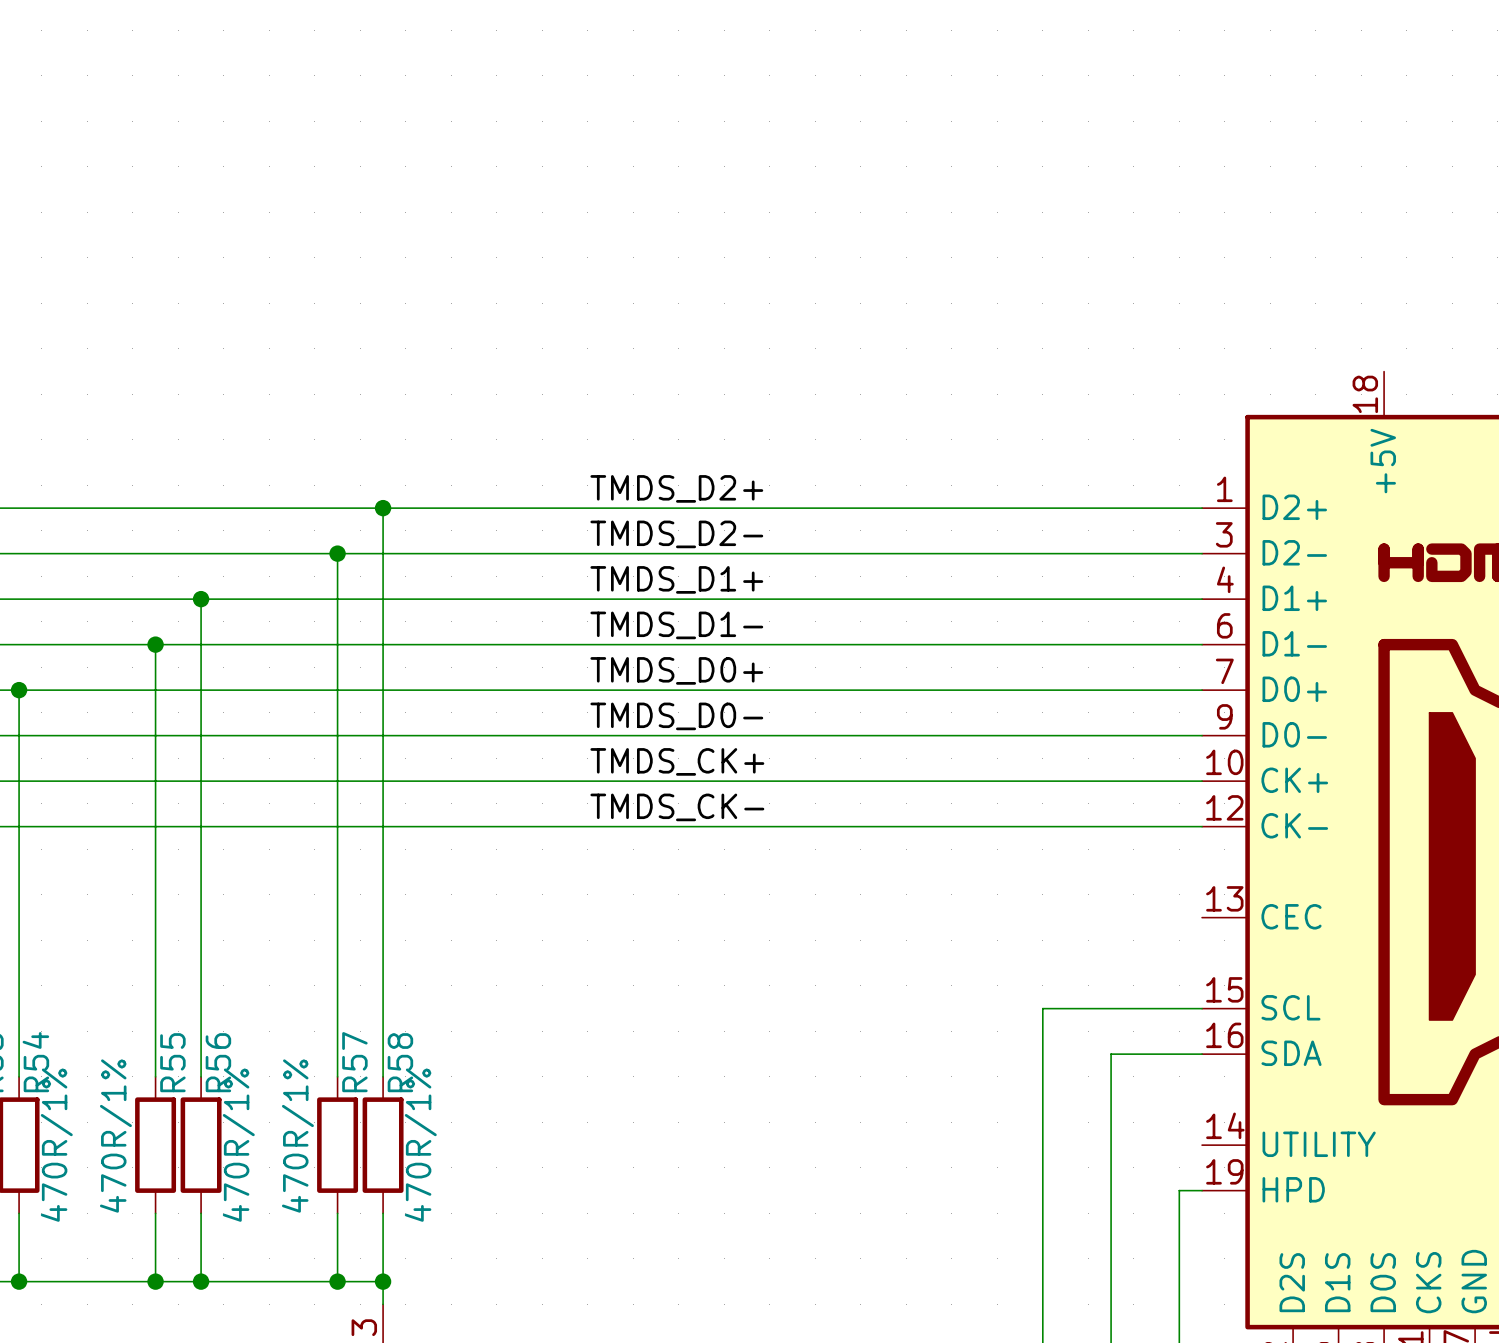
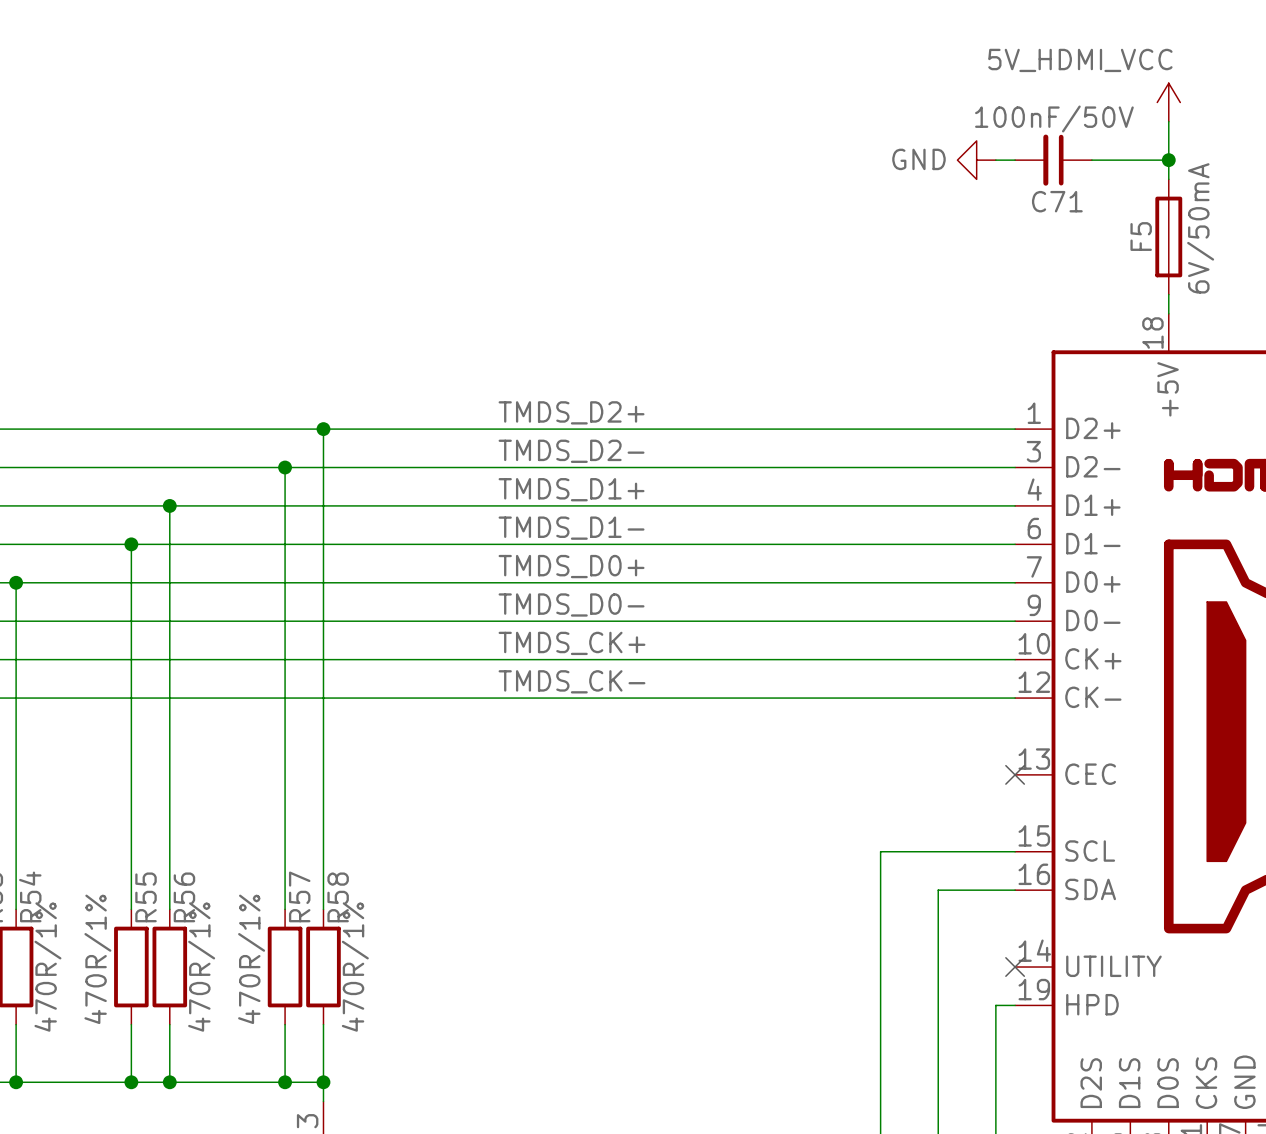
power symbol: none -> 5V_HDMI_VCC (1168, 102)
wire: none -> (1168, 121) (1168, 179)
power symbol: none -> GND (976, 160)
wire: none -> (995, 160) (1015, 160)
C71: none -> 100nF/50V (1053, 160)
wire: none -> (1091, 160) (1168, 160)
junction: none -> (1168, 160)
F5: none -> 6V/50mA (1168, 236)
wire: none -> (1168, 294) (1168, 313)
no-connect mark: none -> (1015, 774)
no-connect mark: none -> (1015, 967)

